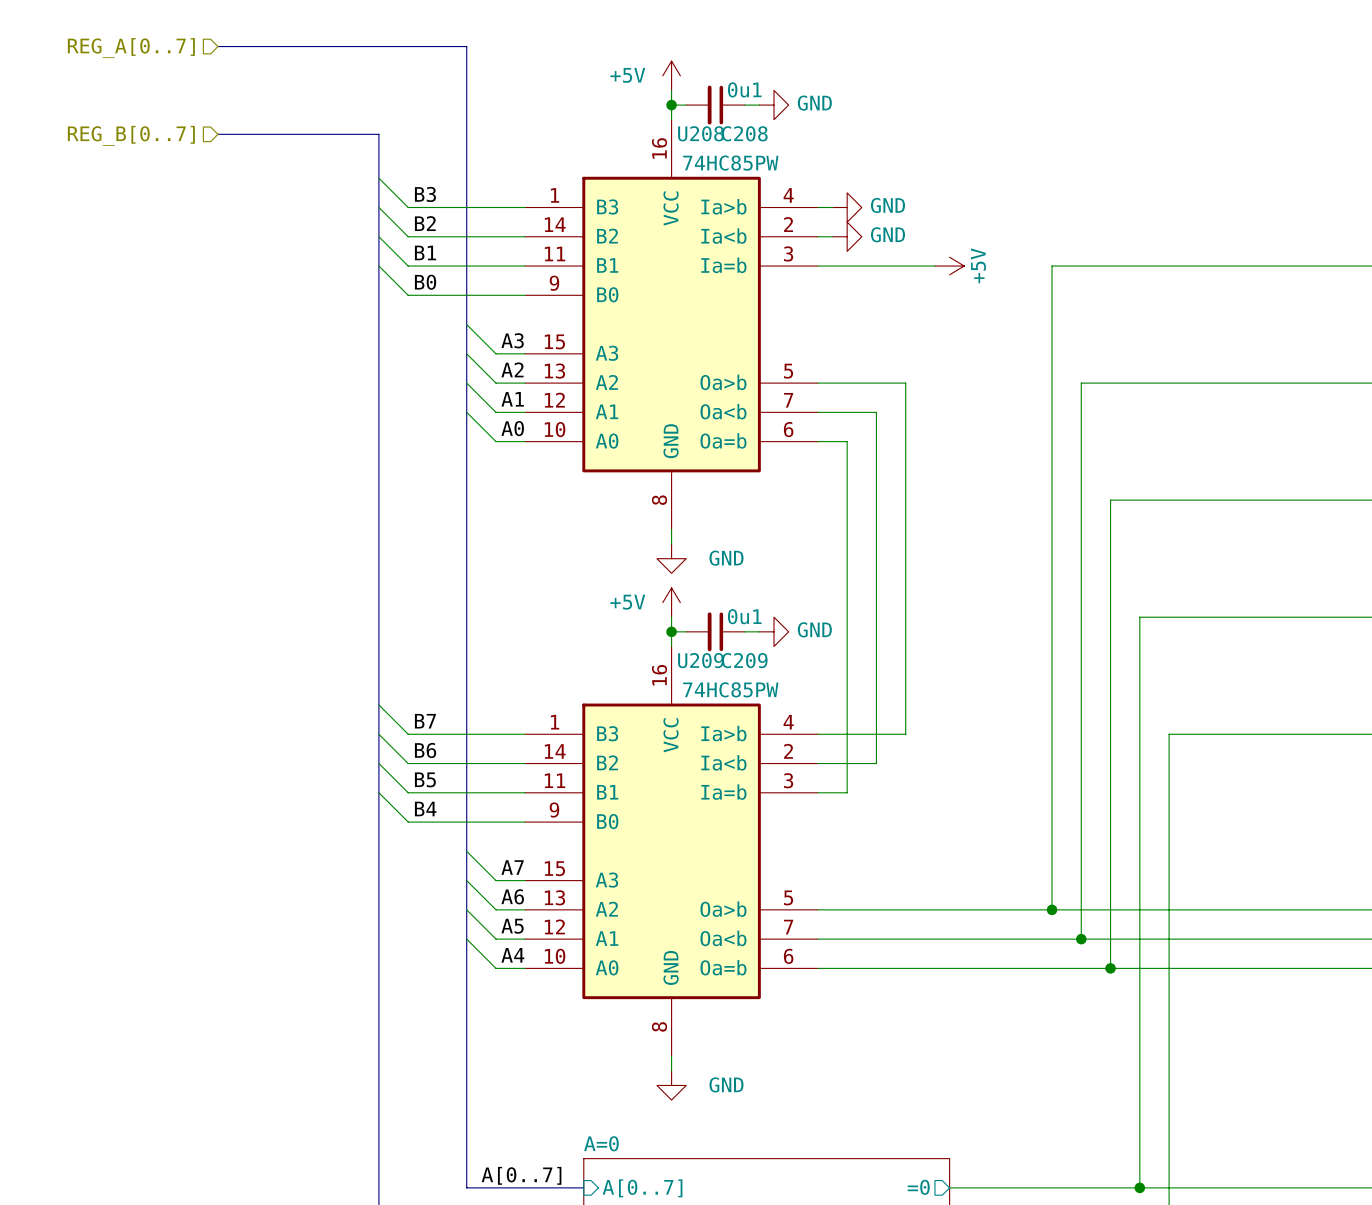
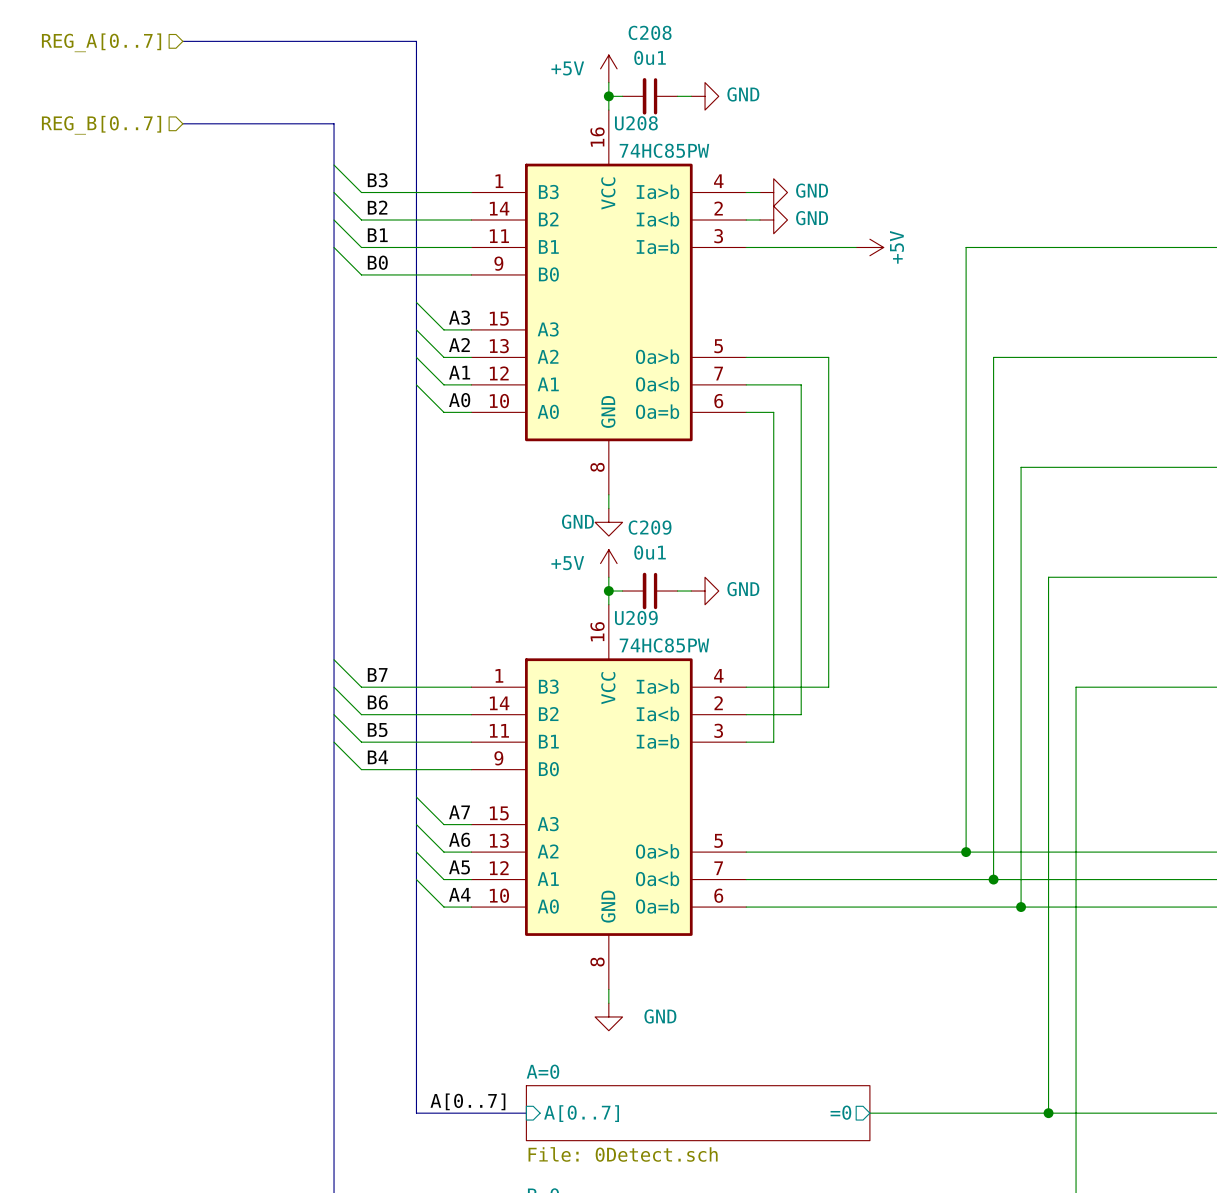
C208 value position: 0u1 (744, 89) -> 0u1 (650, 57)
C208 name position: C208 (744, 133) -> C208 (650, 32)
power symbol text position: GND (726, 558) -> GND (577, 521)
C209 value position: 0u1 (744, 616) -> 0u1 (650, 552)
C209 name position: C209 (744, 660) -> C209 (650, 527)

